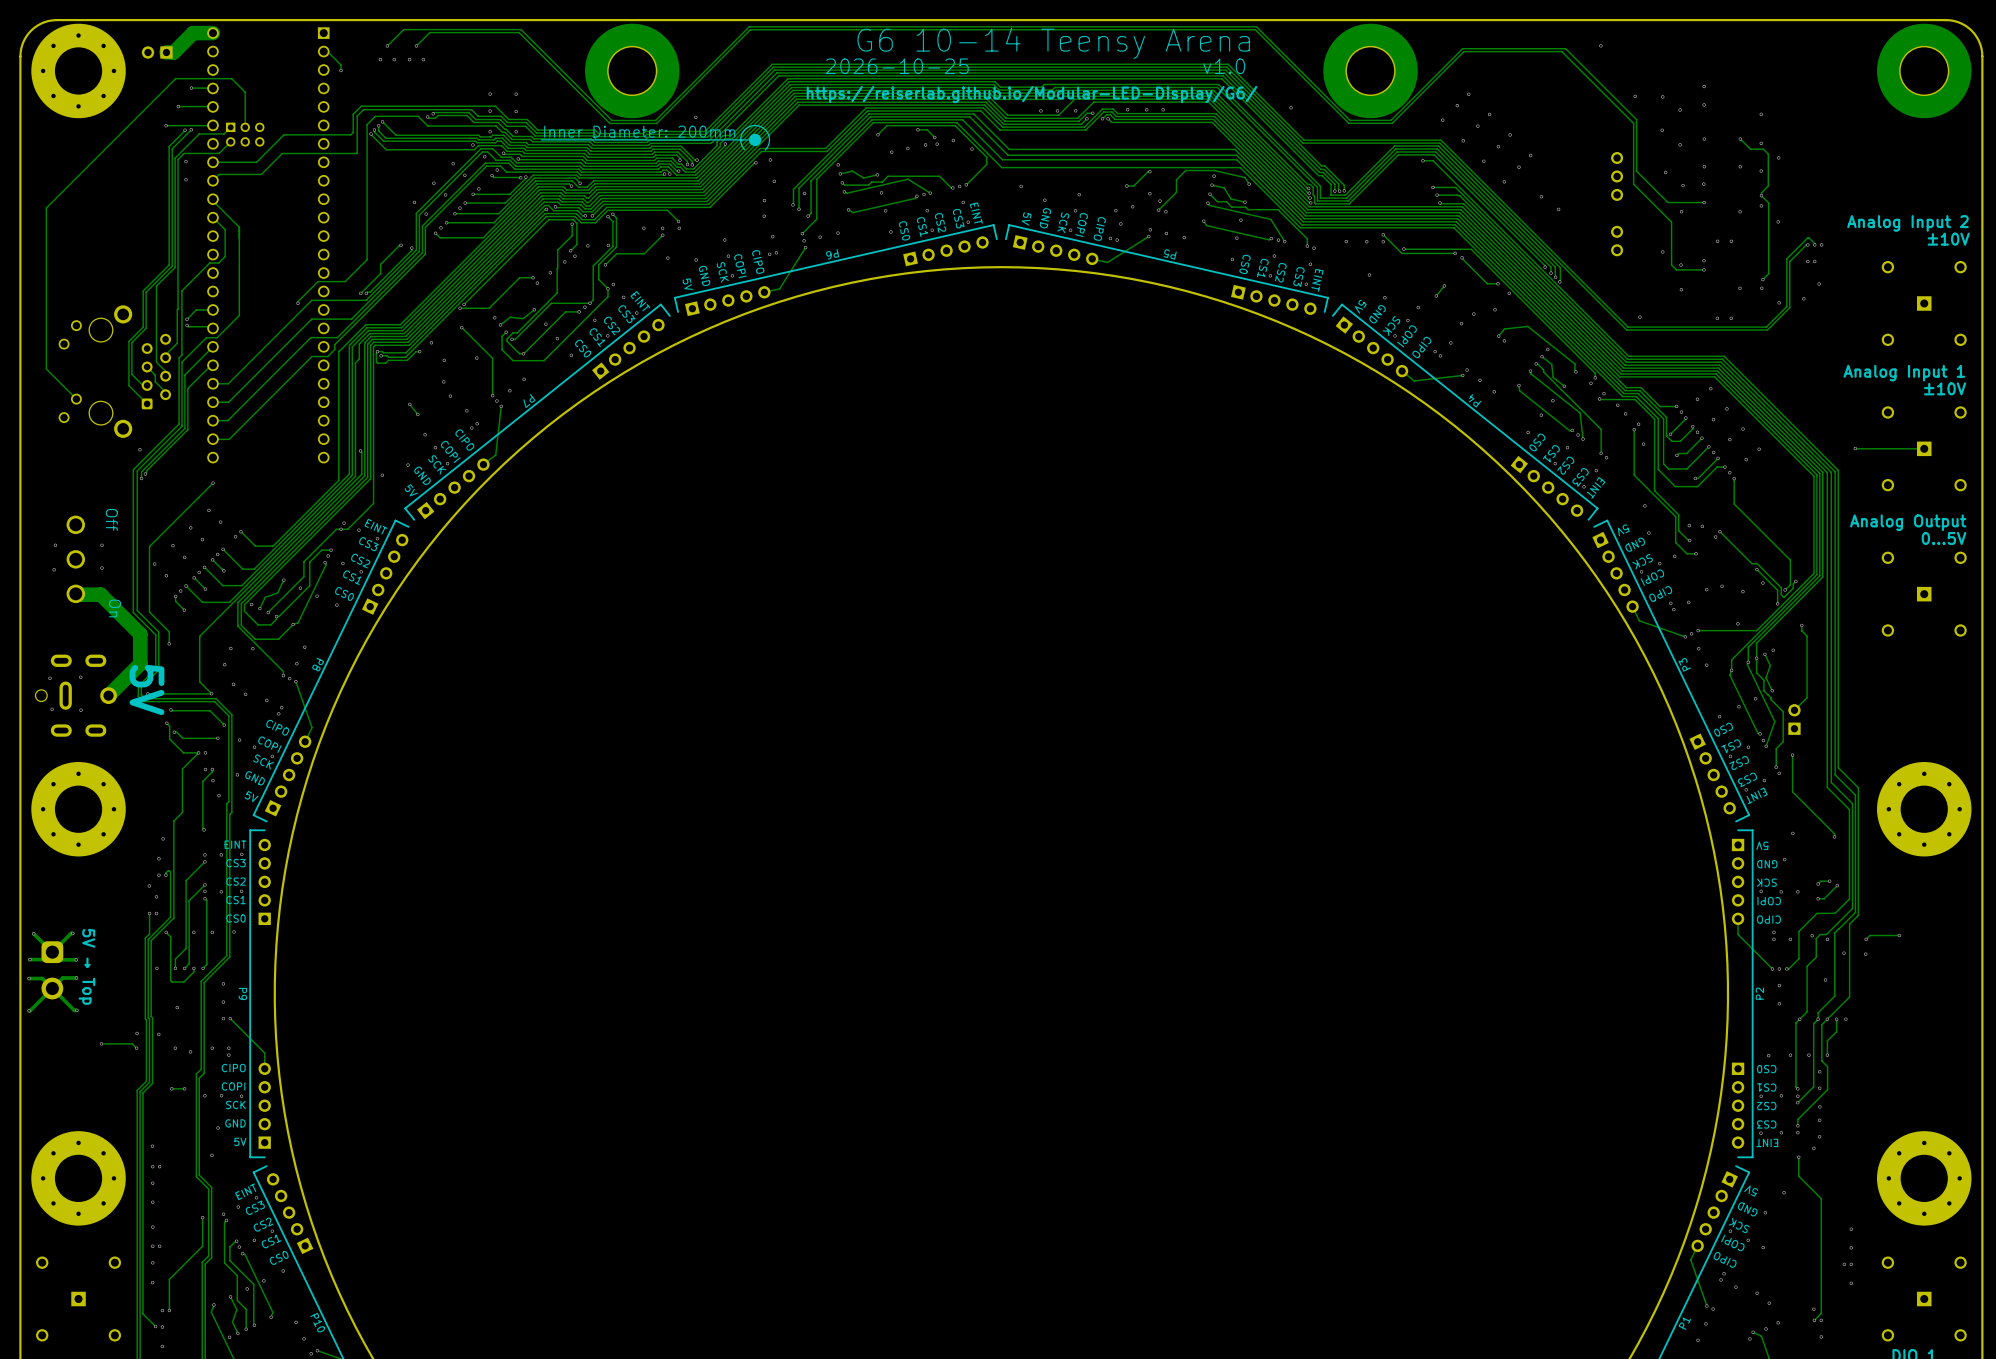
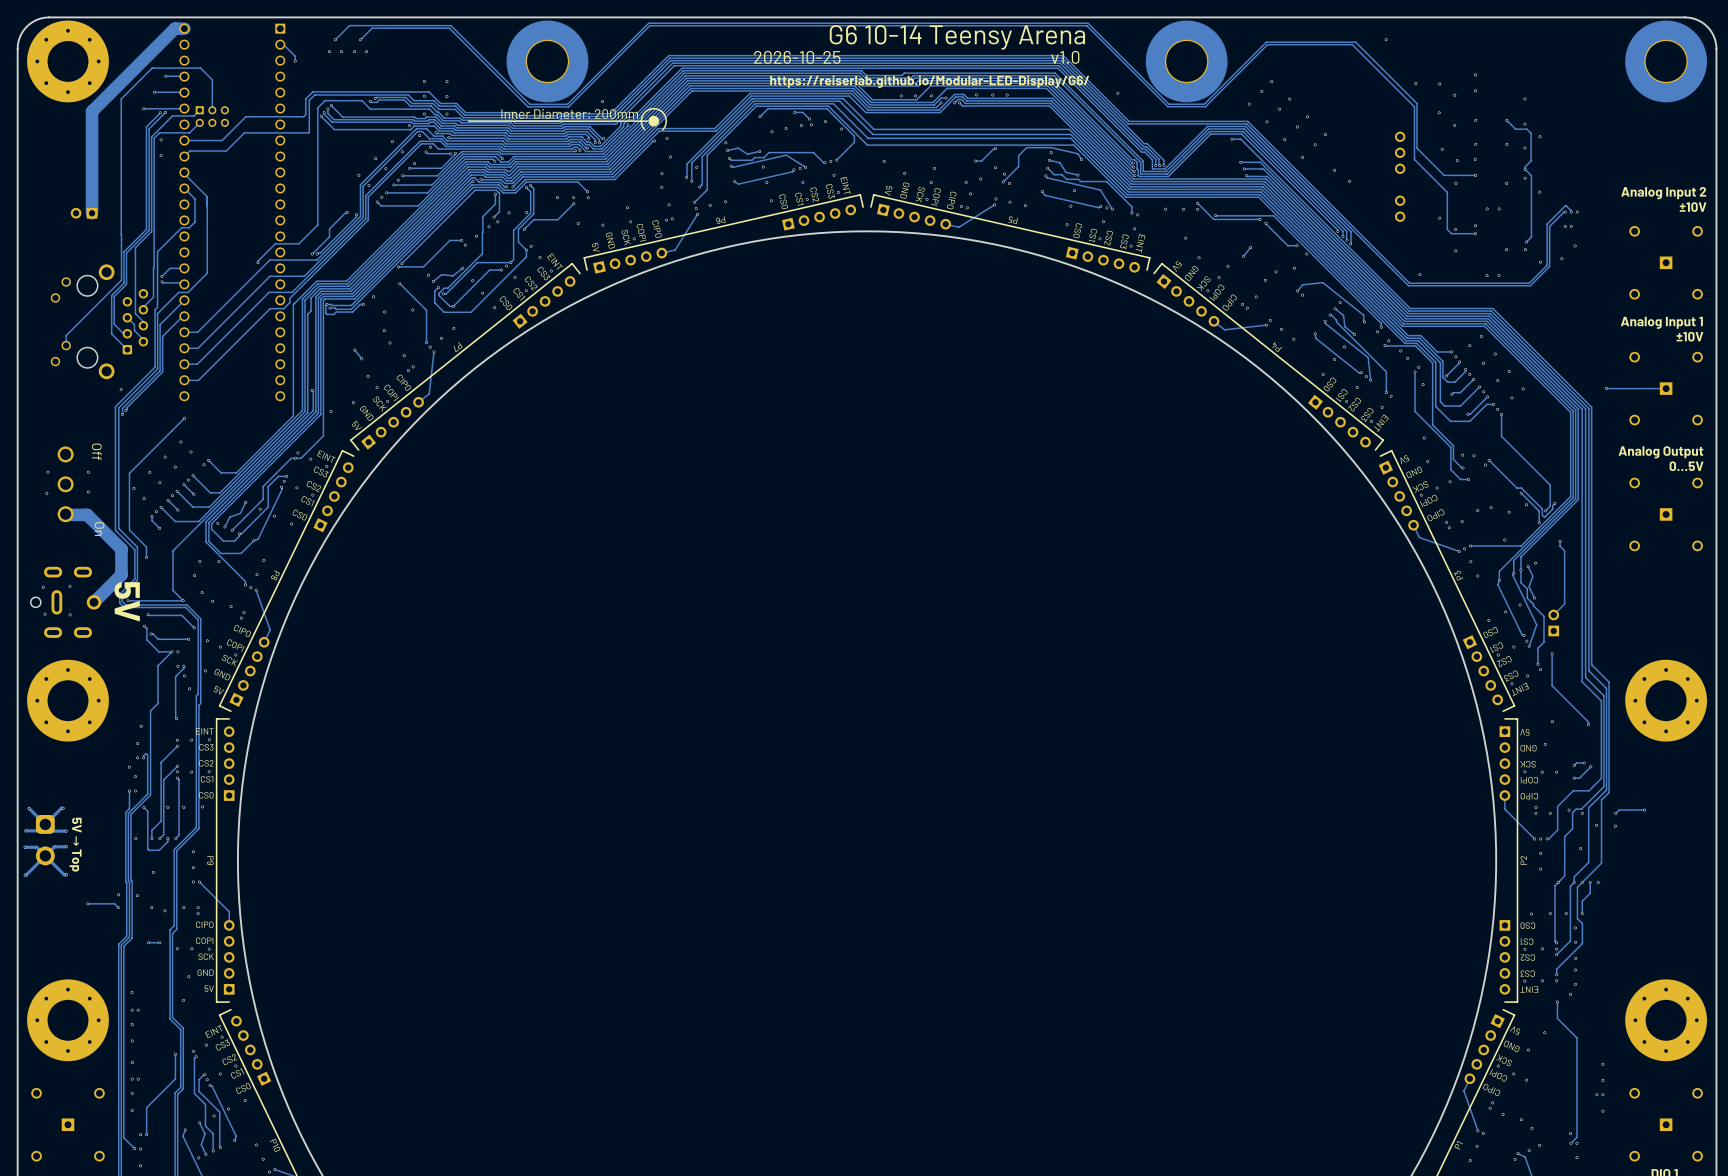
track: (201, 33) (193, 33) (173, 52) (166, 52) -> (174, 28) (92, 111) (92, 213)
part: (157, 52) -> none
track: (140, 114) (46, 208) (46, 369) (76, 399) -> (121, 99) (121, 280) (66, 335) (66, 345)
part: none -> (84, 213)

